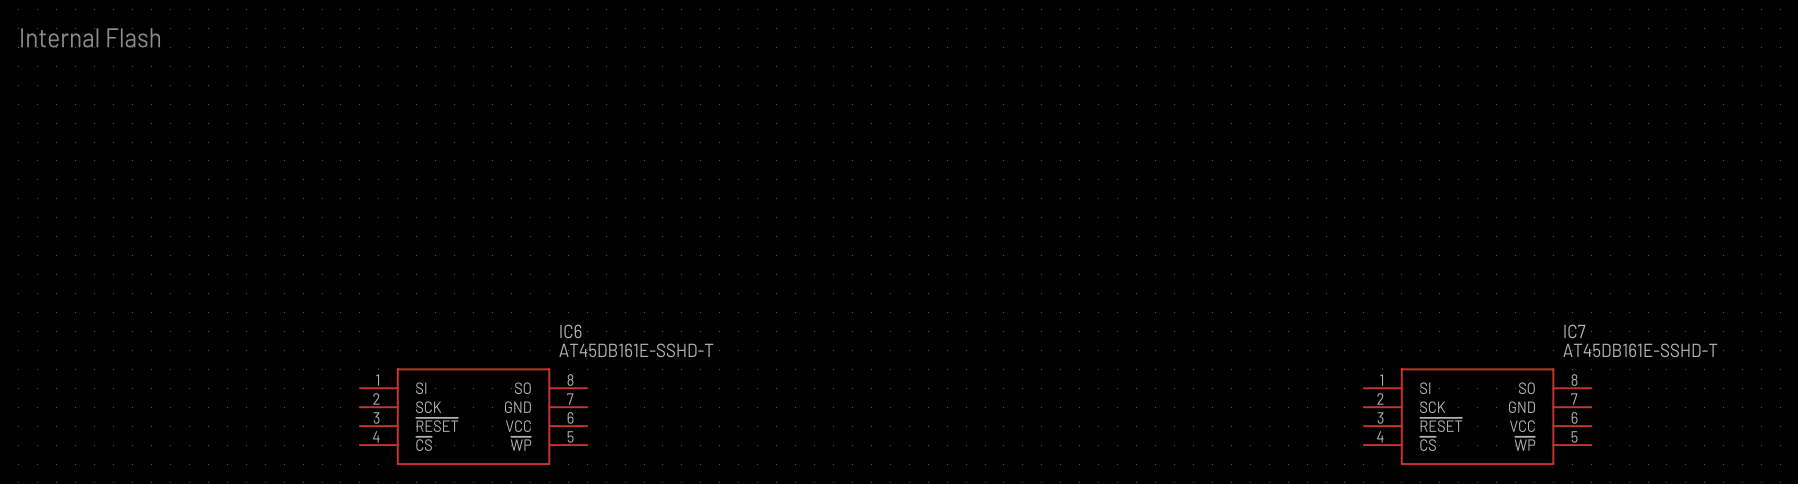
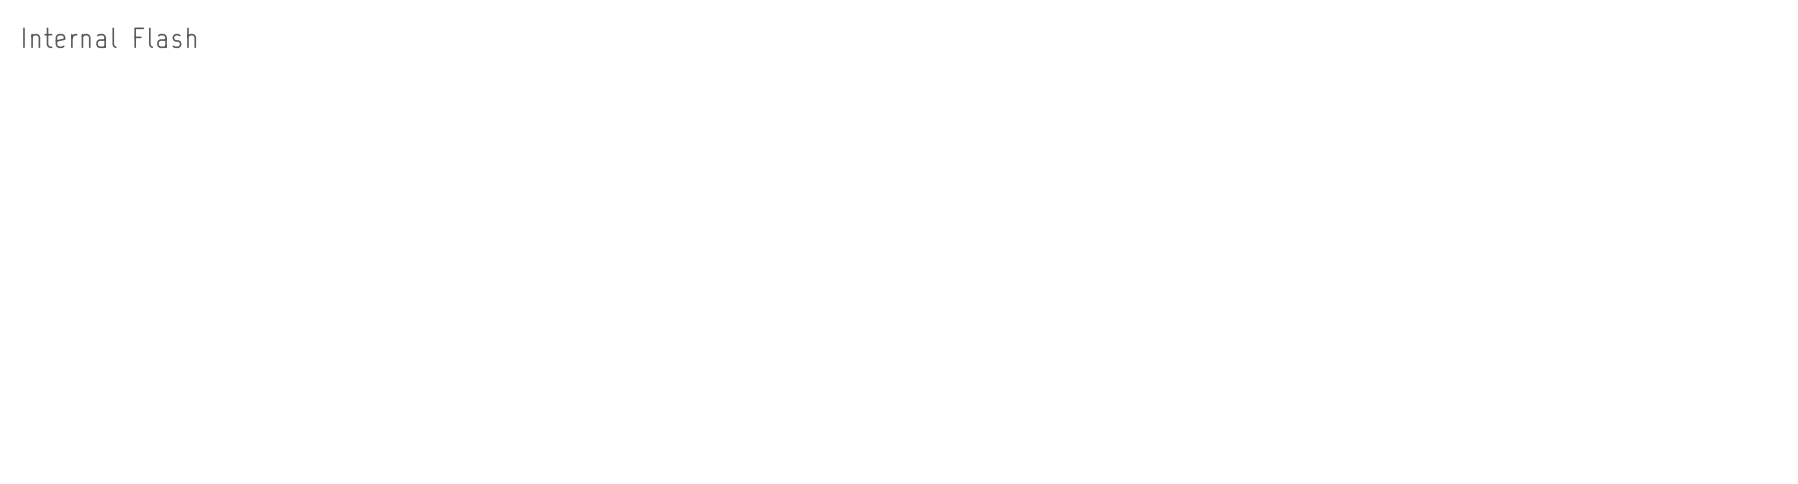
IC6: AT45DB161E-SSHD-T (473, 416) -> none
IC7: AT45DB161E-SSHD-T (1477, 416) -> none

